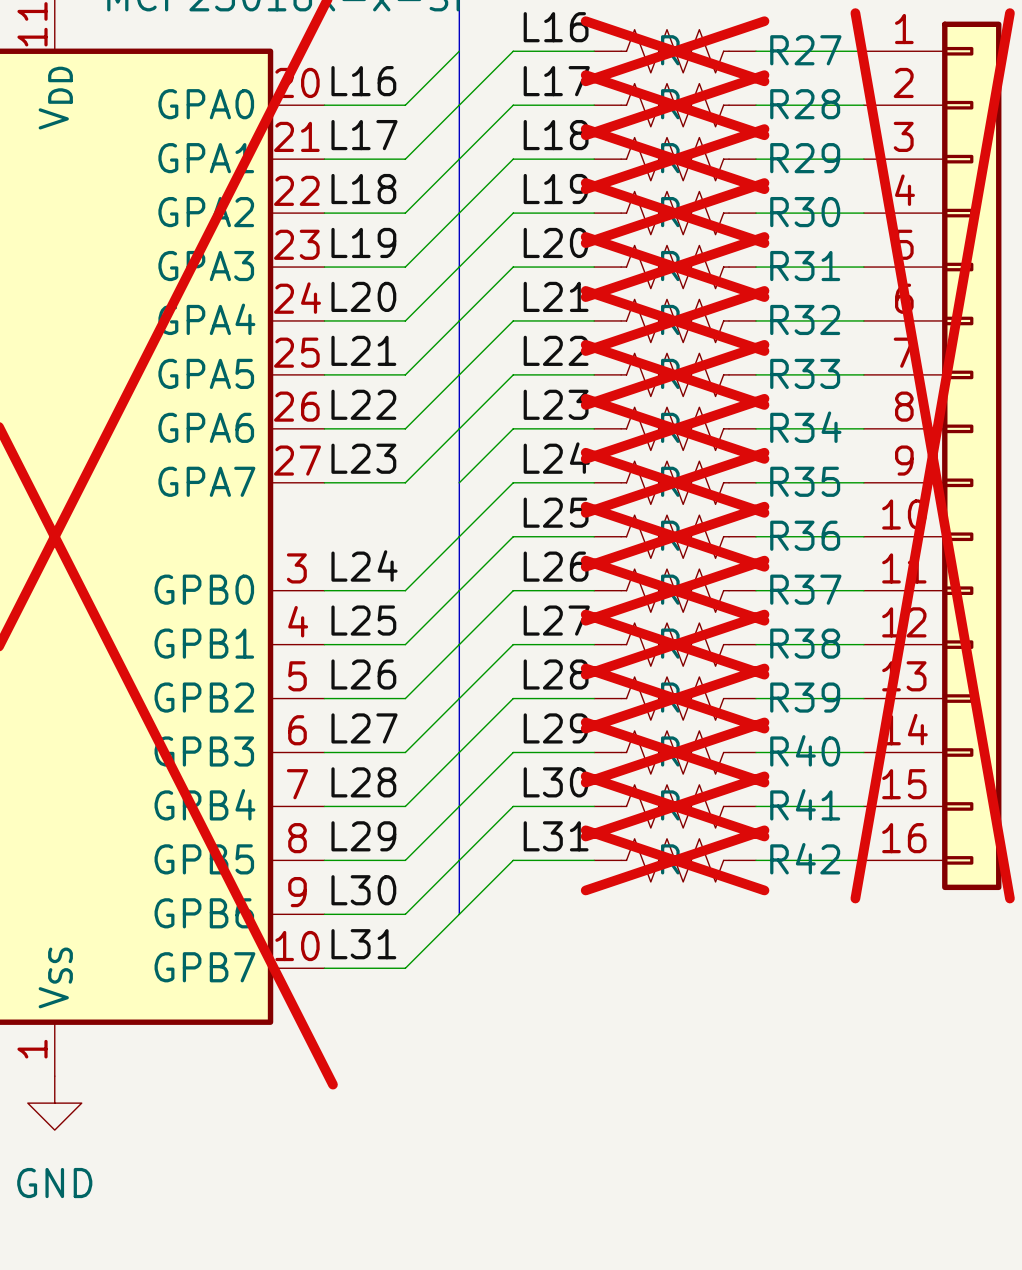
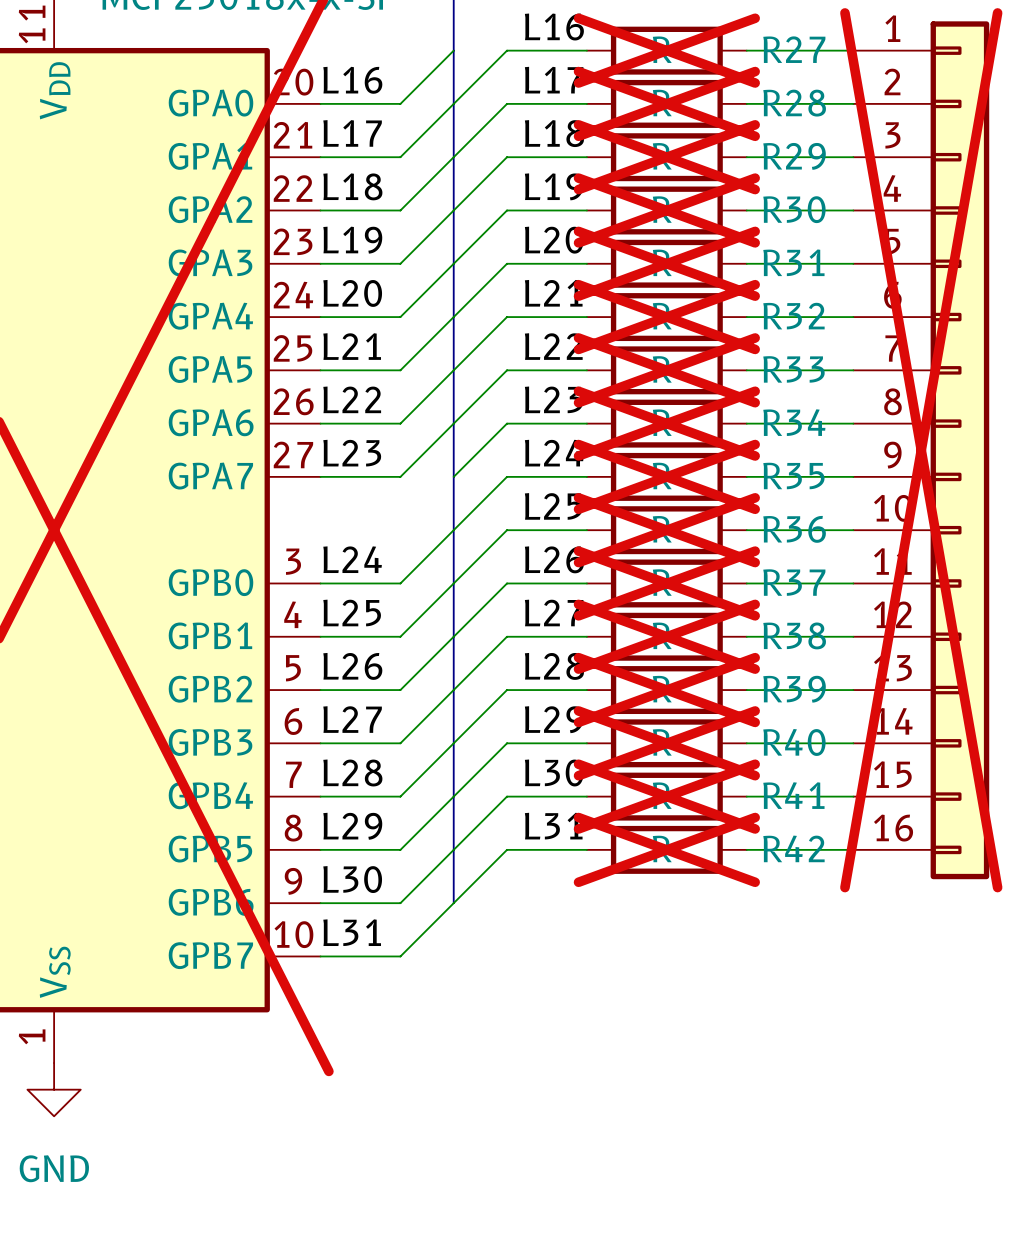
R27 symbol: [594, 29, 757, 73] -> [586, 26, 747, 75]
R28 symbol: [594, 83, 757, 127] -> [586, 79, 747, 128]
R29 symbol: [594, 137, 757, 181] -> [586, 133, 747, 182]
R30 symbol: [594, 191, 757, 235] -> [586, 186, 747, 235]
R31 symbol: [594, 245, 757, 289] -> [586, 239, 747, 288]
R32 symbol: [594, 299, 757, 343] -> [586, 293, 747, 342]
R33 symbol: [594, 353, 757, 397] -> [586, 346, 747, 395]
R34 symbol: [594, 407, 757, 451] -> [586, 399, 747, 448]
R35 symbol: [594, 461, 757, 505] -> [586, 452, 747, 501]
R36 symbol: [594, 515, 757, 559] -> [586, 506, 747, 555]
R37 symbol: [594, 569, 757, 613] -> [586, 559, 747, 608]
R38 symbol: [594, 623, 757, 667] -> [586, 612, 747, 661]
R39 symbol: [594, 676, 757, 721] -> [586, 666, 747, 715]
R40 symbol: [594, 730, 757, 775] -> [586, 719, 747, 768]
R41 symbol: [594, 784, 757, 829] -> [586, 772, 747, 821]
R42 symbol: [594, 838, 757, 882] -> [586, 825, 747, 874]

